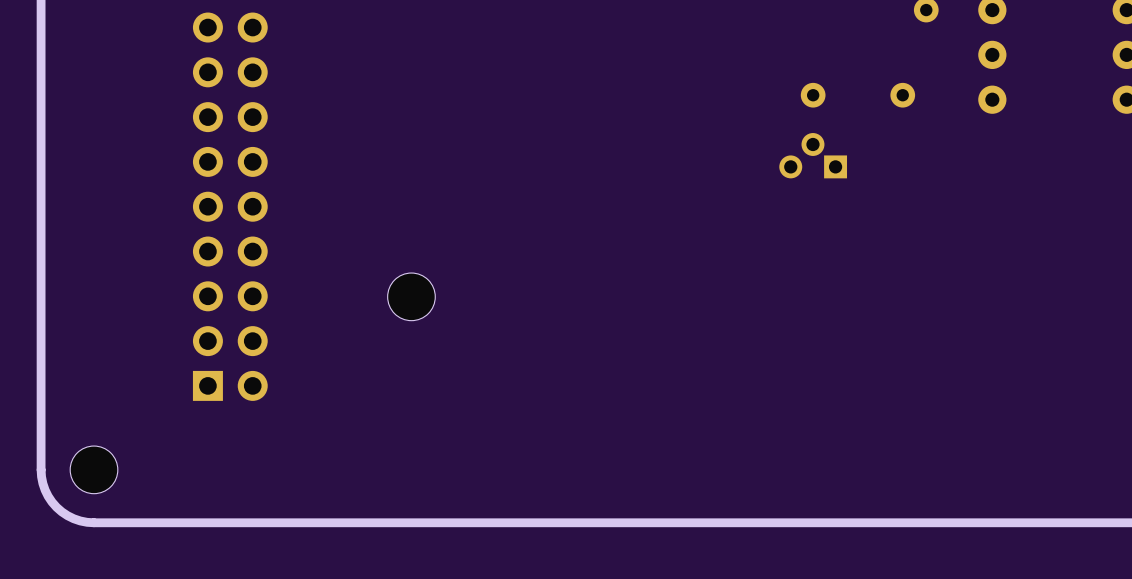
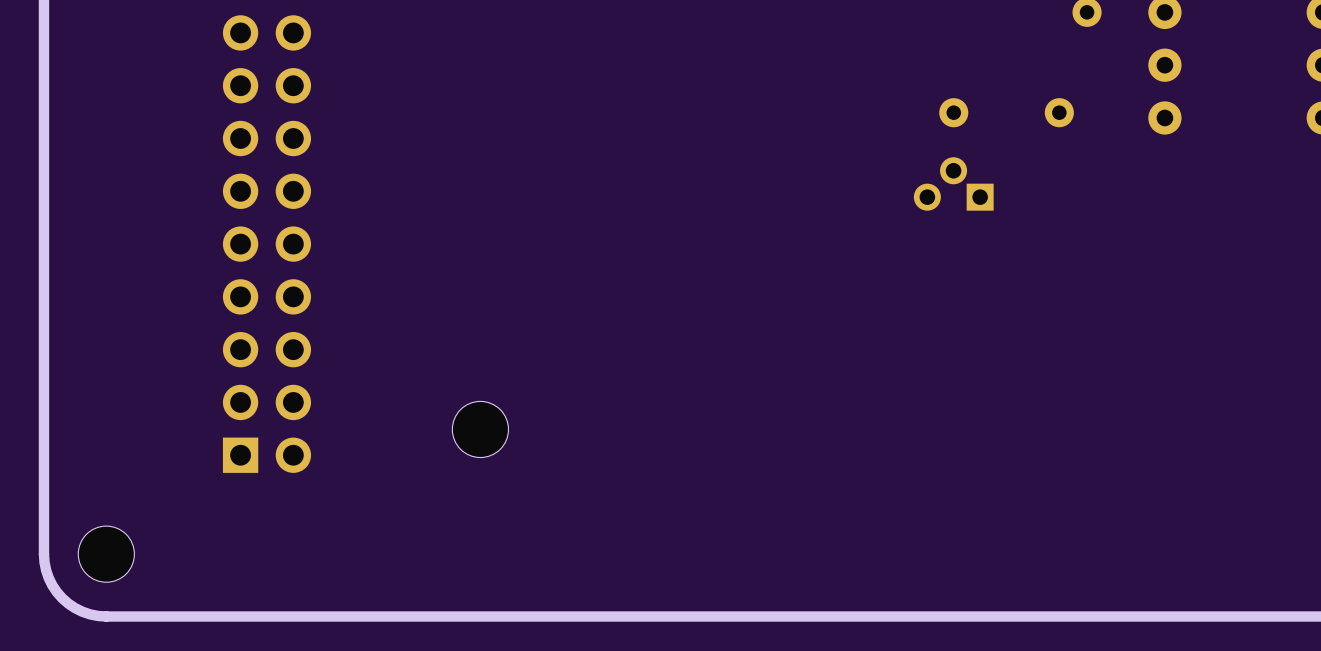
part position: (411, 296) -> (480, 429)

